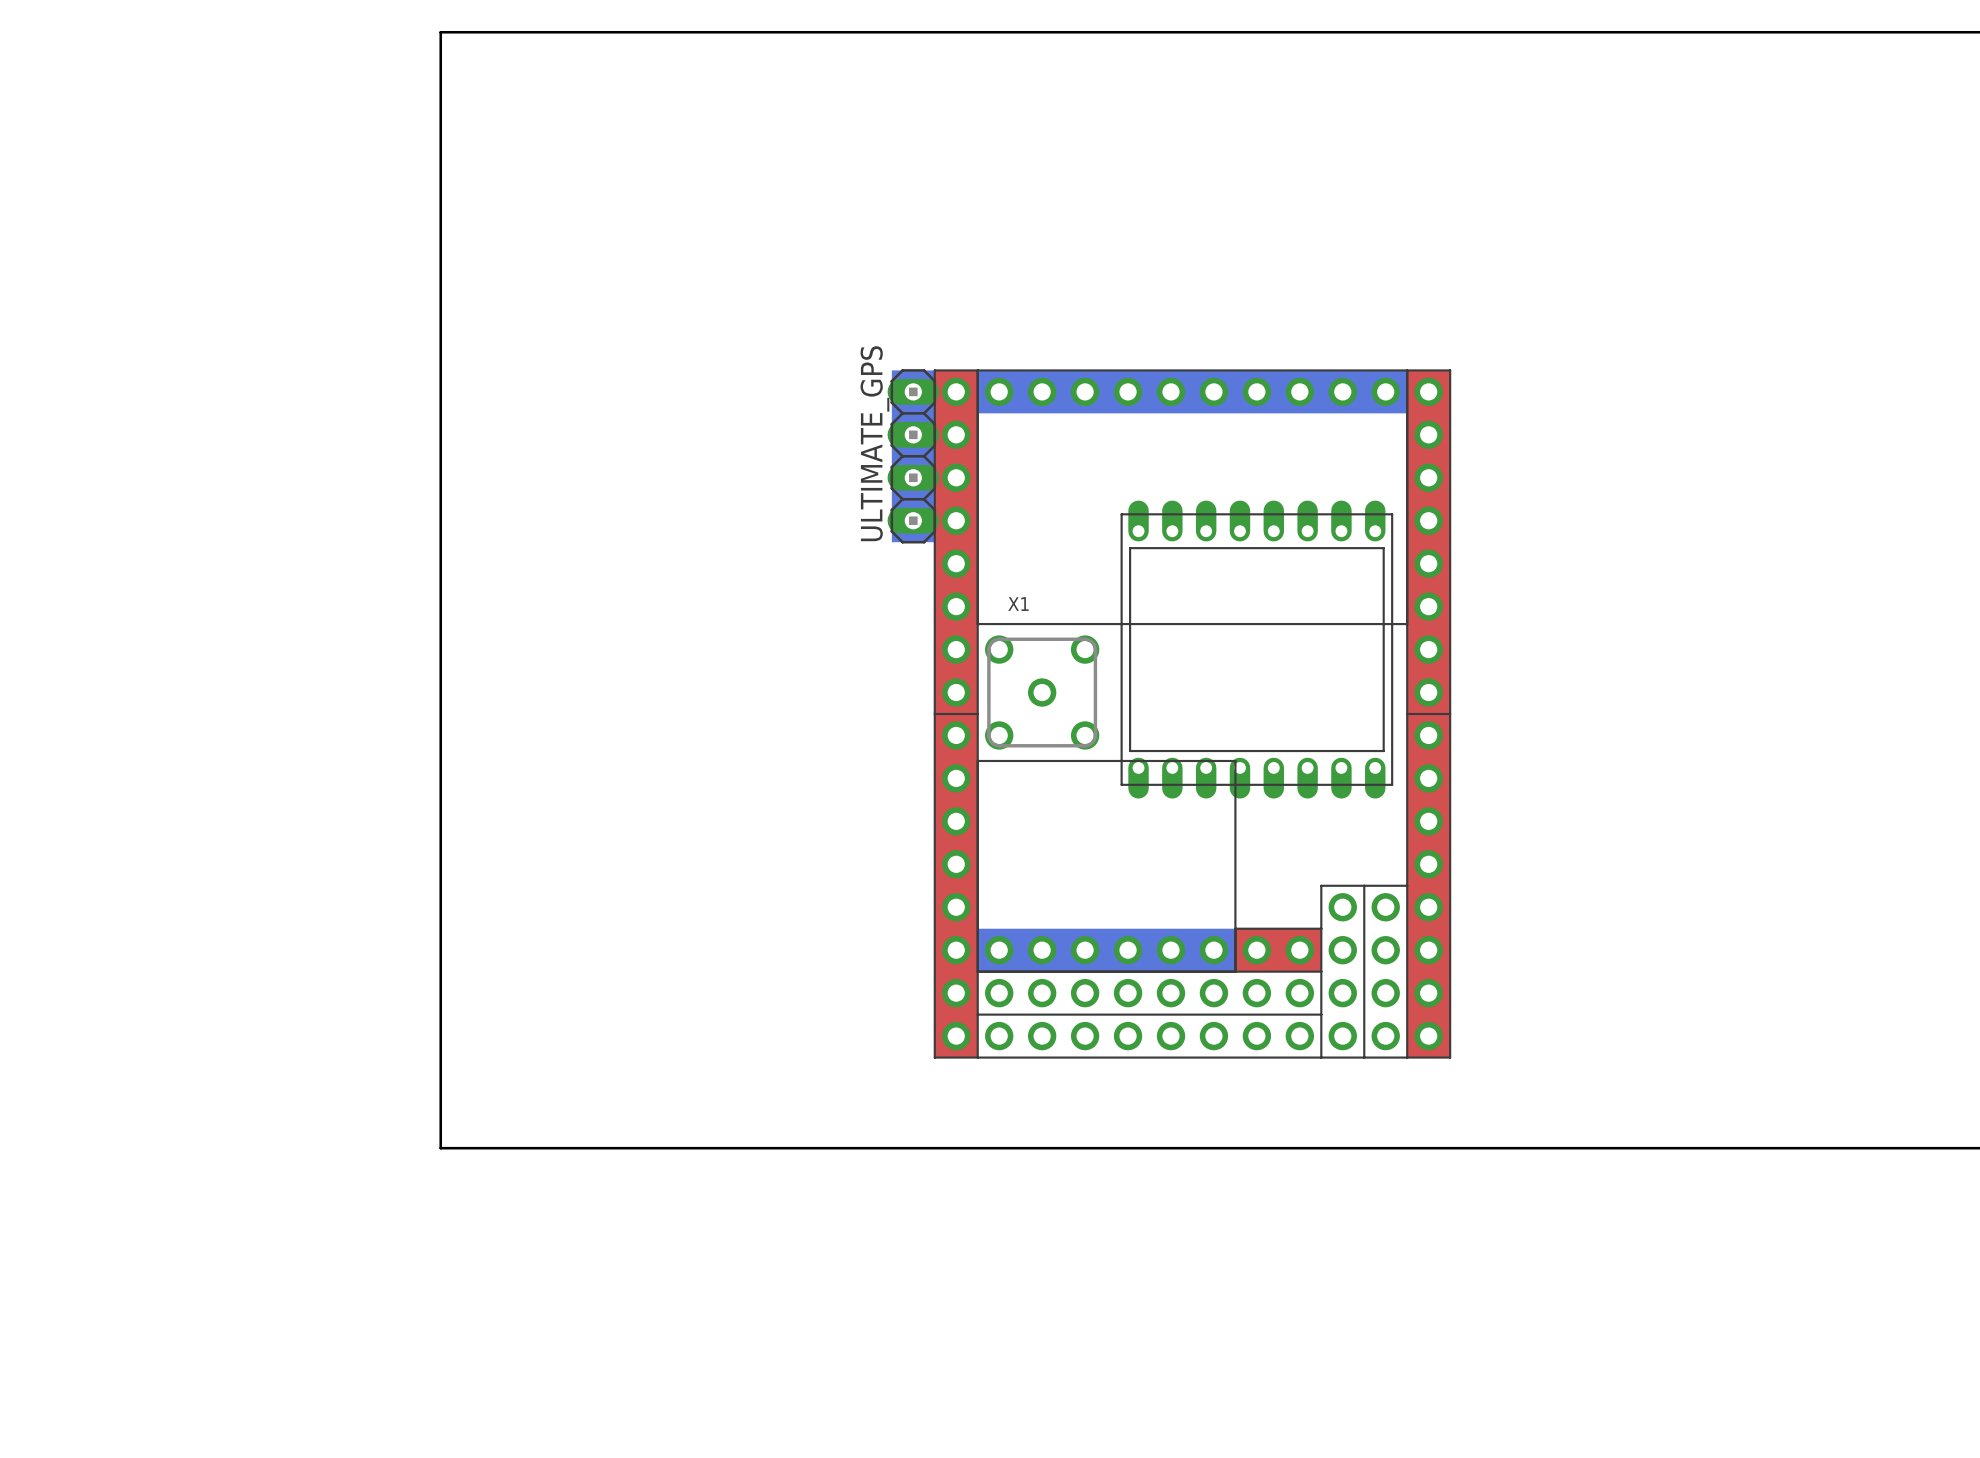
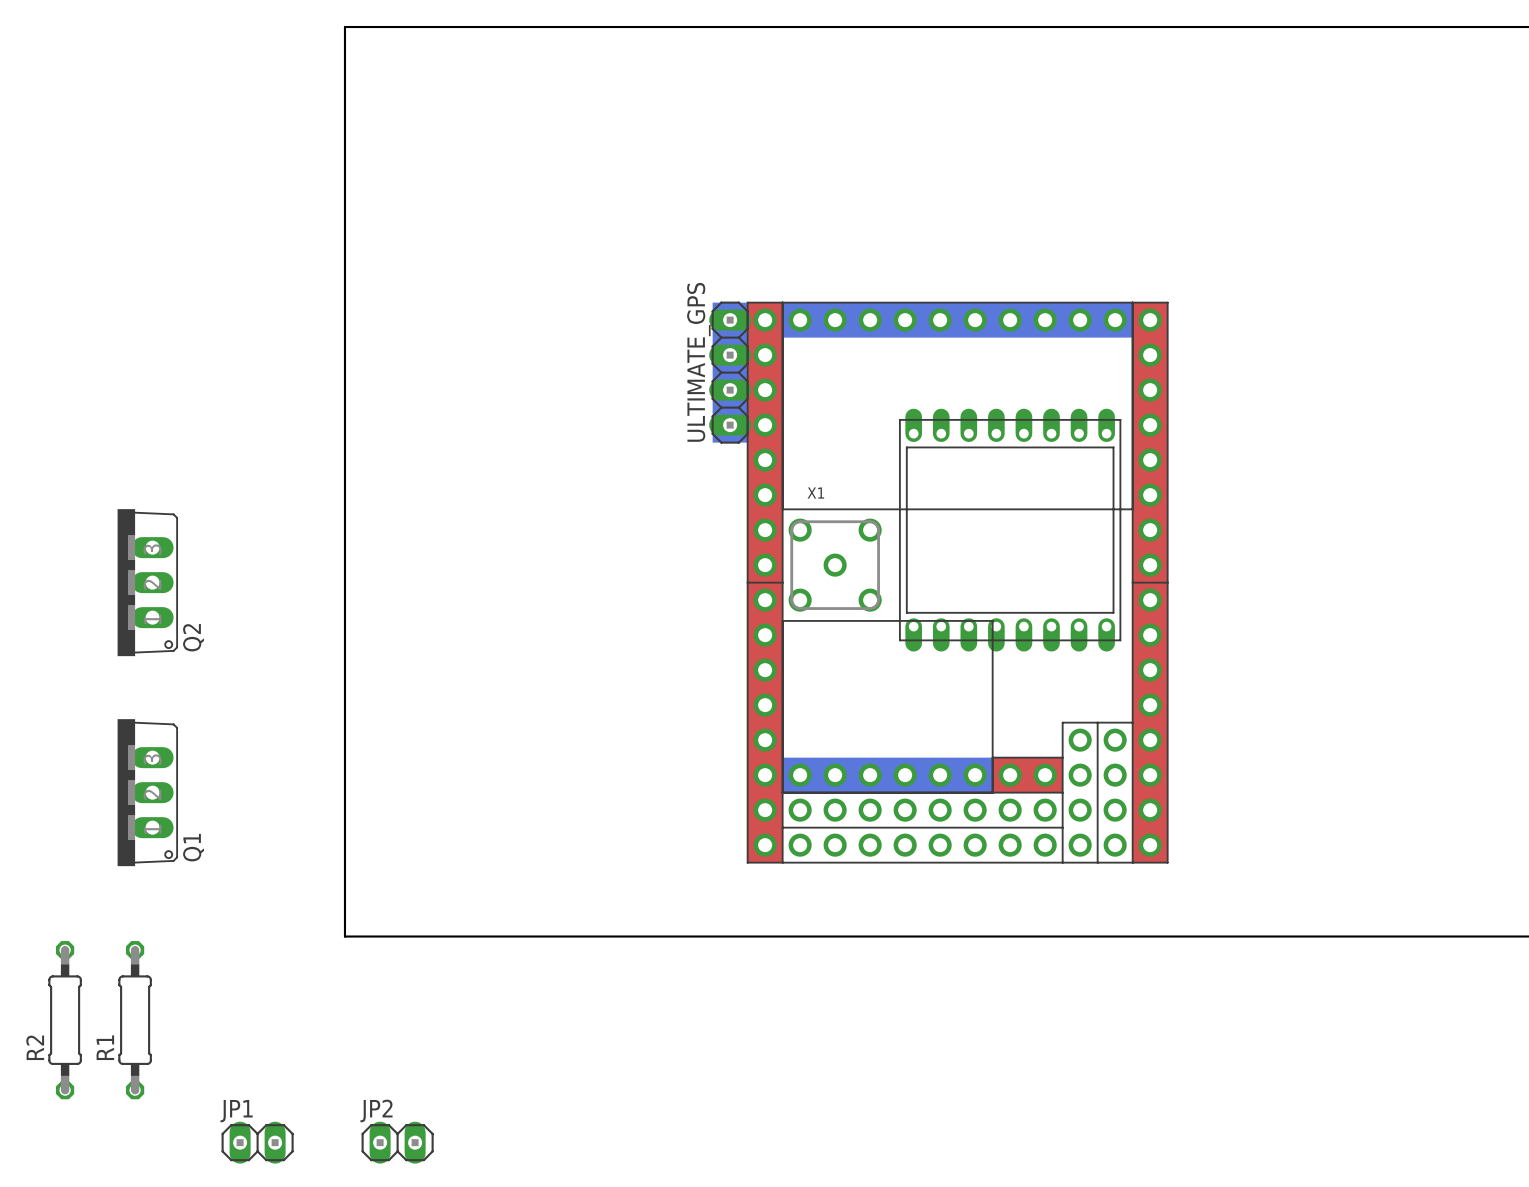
Q2: none -> (147, 582)
Q1: none -> (147, 792)
R2: none -> (65, 1020)
R1: none -> (135, 1020)
JP1: none -> (257, 1142)
JP2: none -> (397, 1142)

